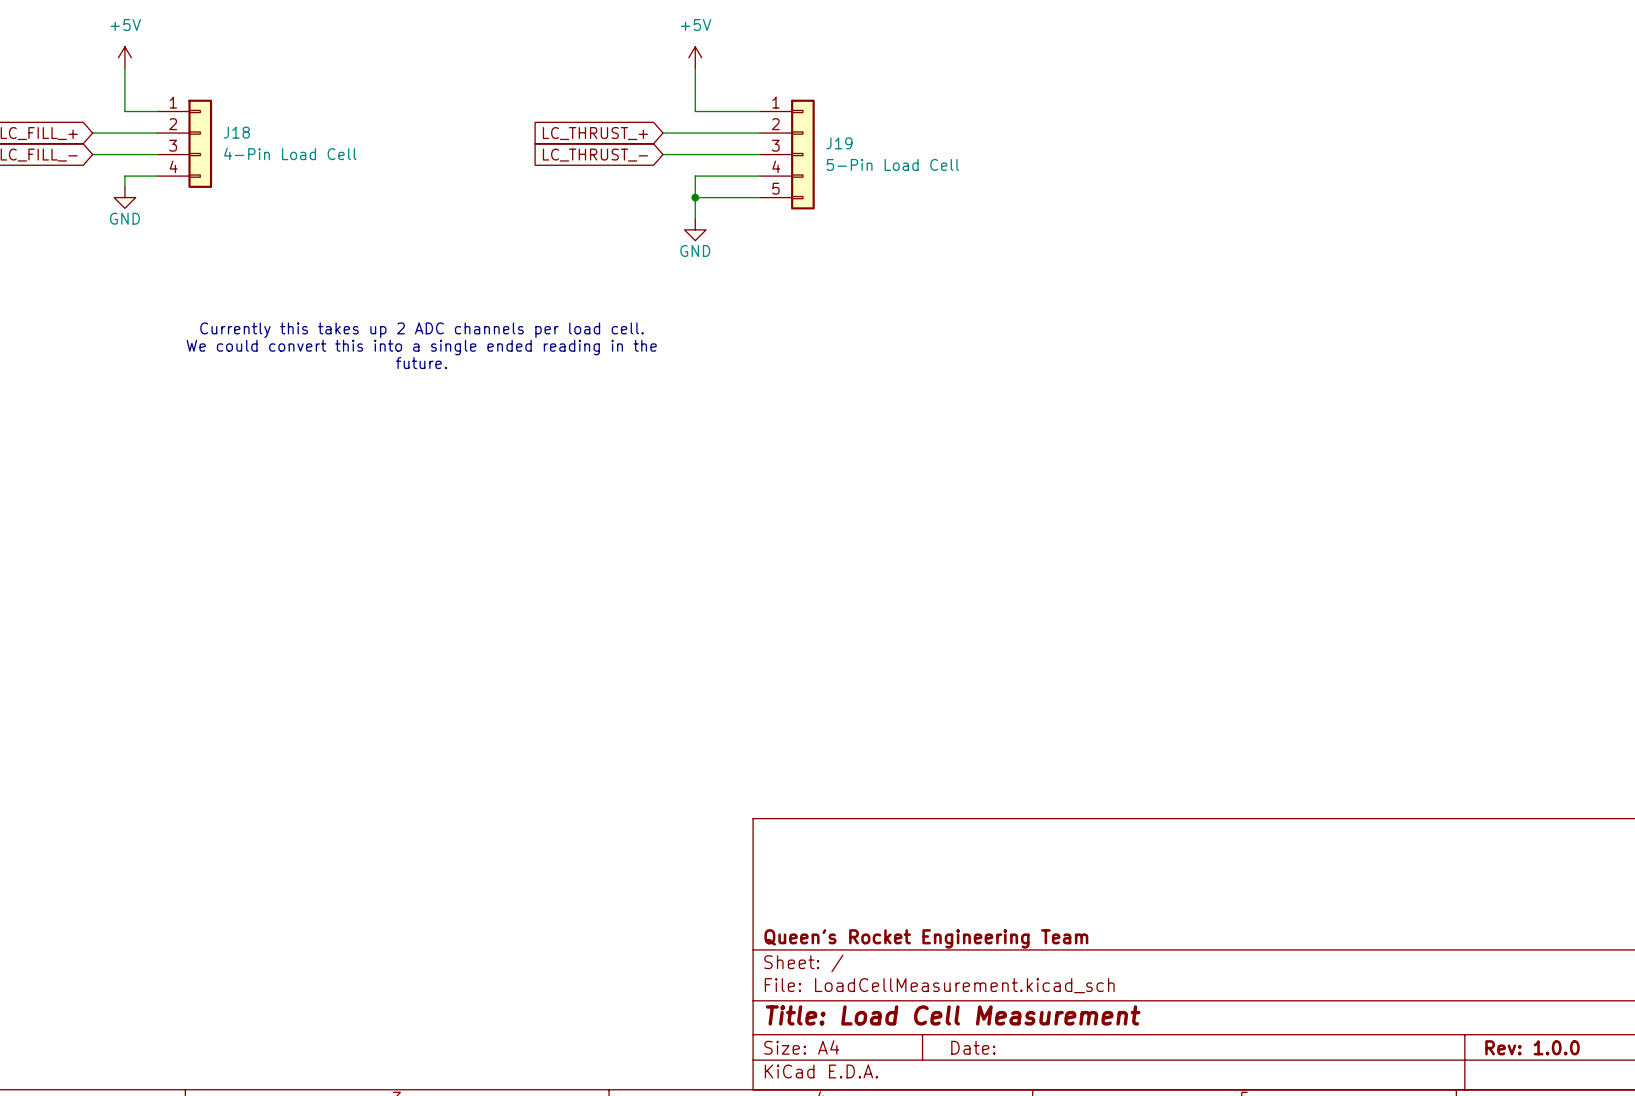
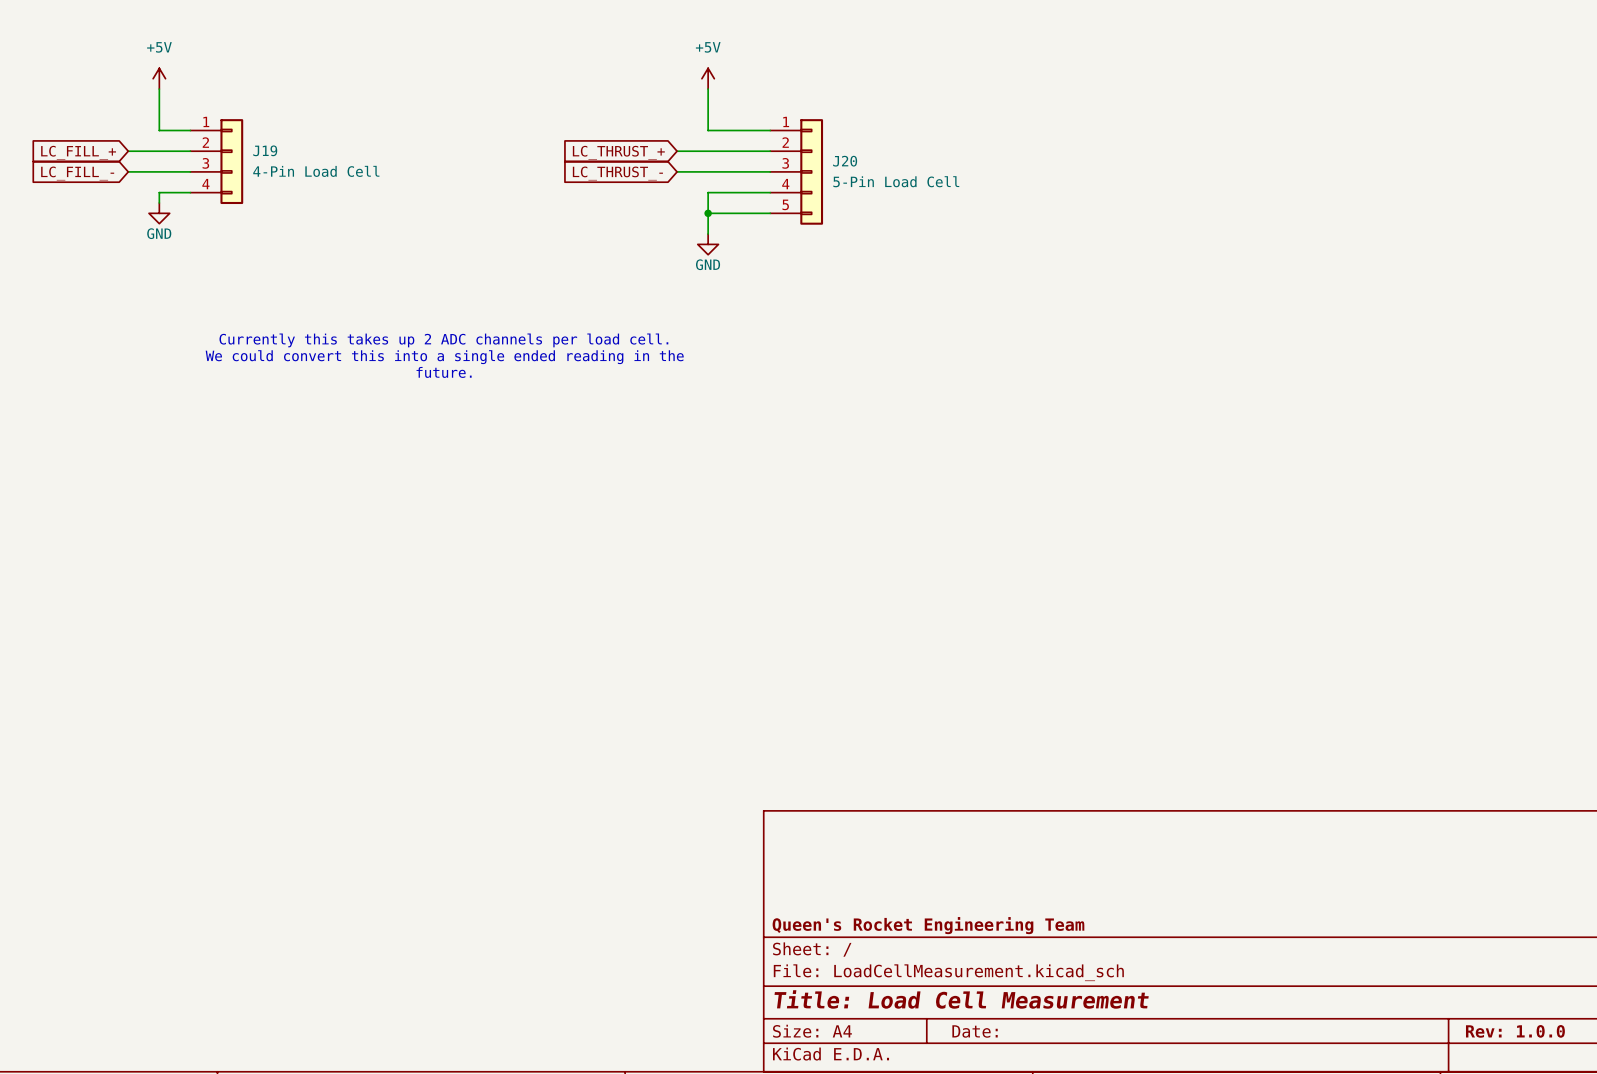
J18 name: J18 (236, 132) -> J19 (265, 150)
J19 name: J19 (839, 143) -> J20 (845, 161)

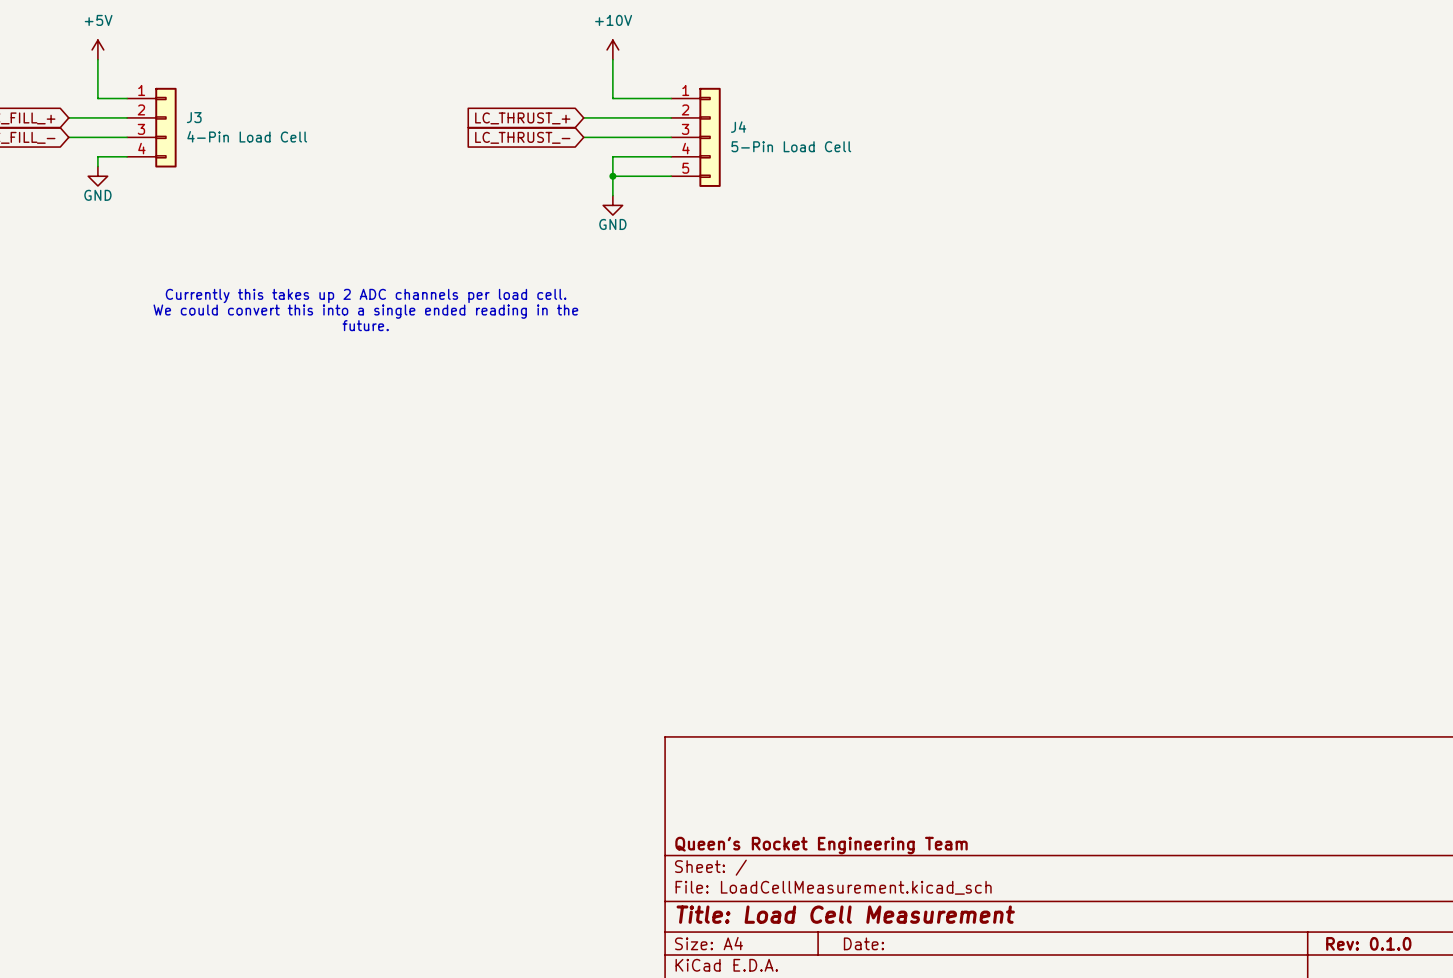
power symbol: +5V (708, 78) -> +10V (612, 49)
J19 name: J19 (265, 150) -> J3 (194, 117)
J20 name: J20 (845, 161) -> J4 (738, 127)
title block: Rev: 1.0.0 (1515, 1031) -> Rev: 0.1.0 (1368, 943)

